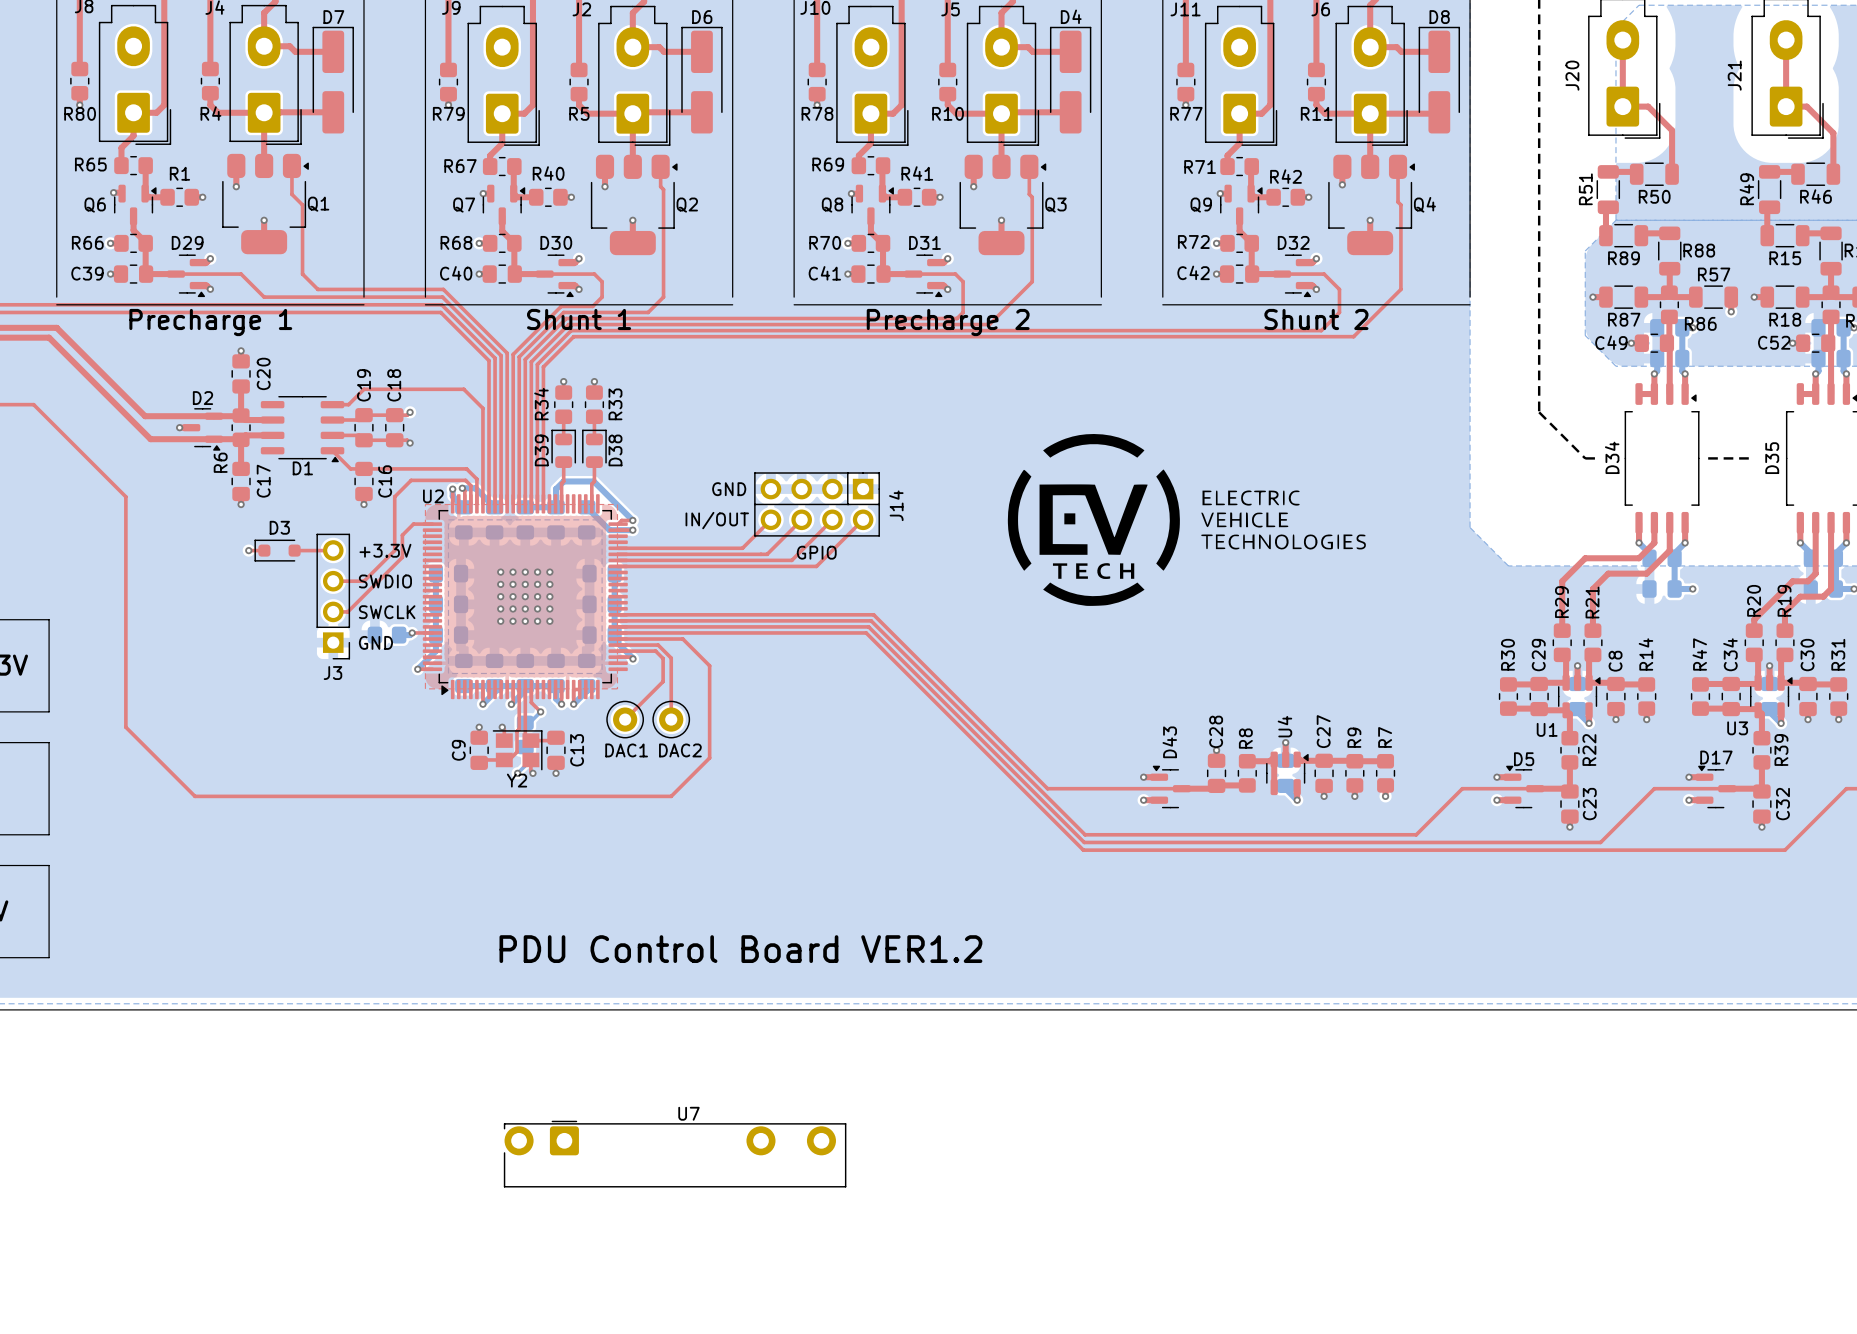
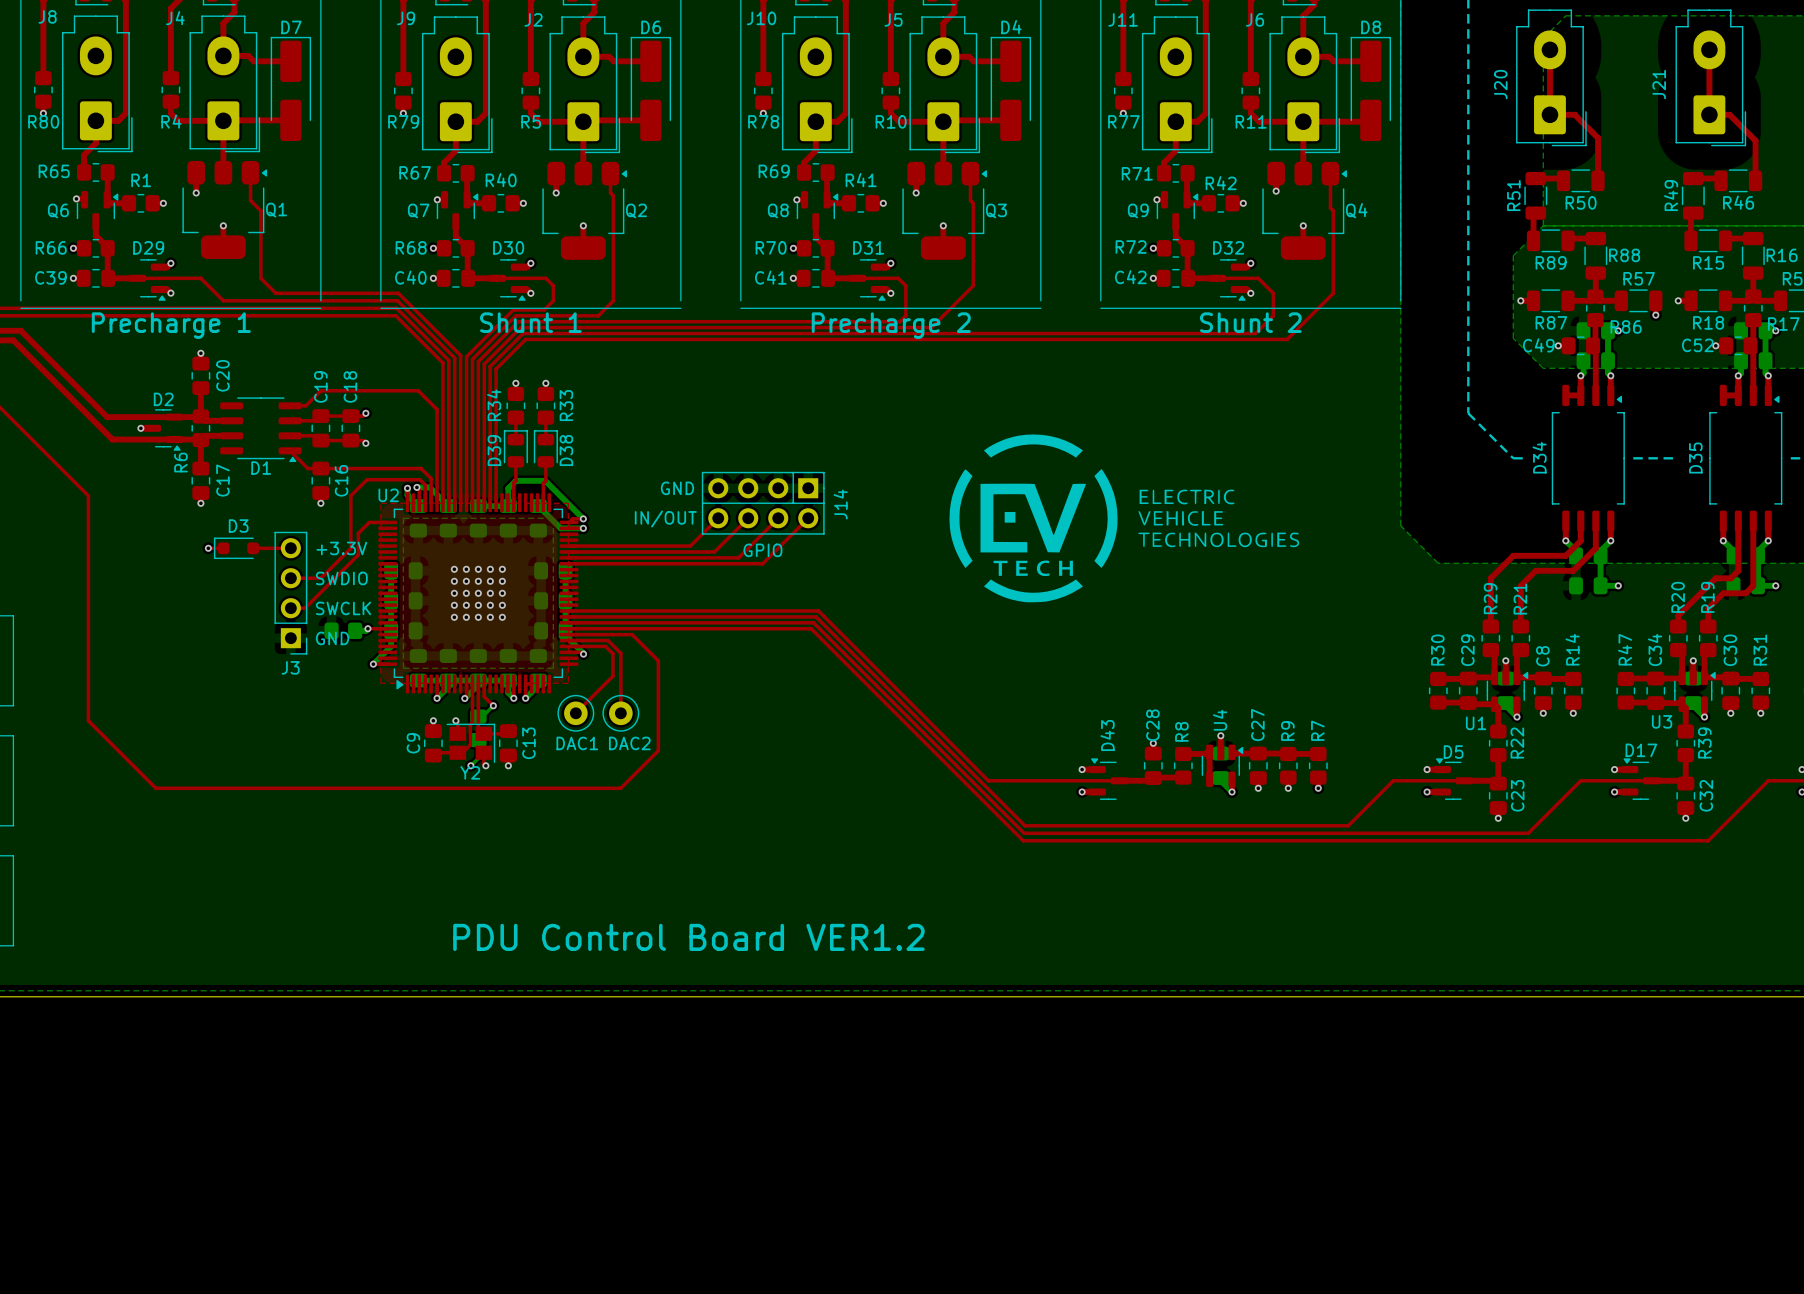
U7: (675, 1154) -> none

